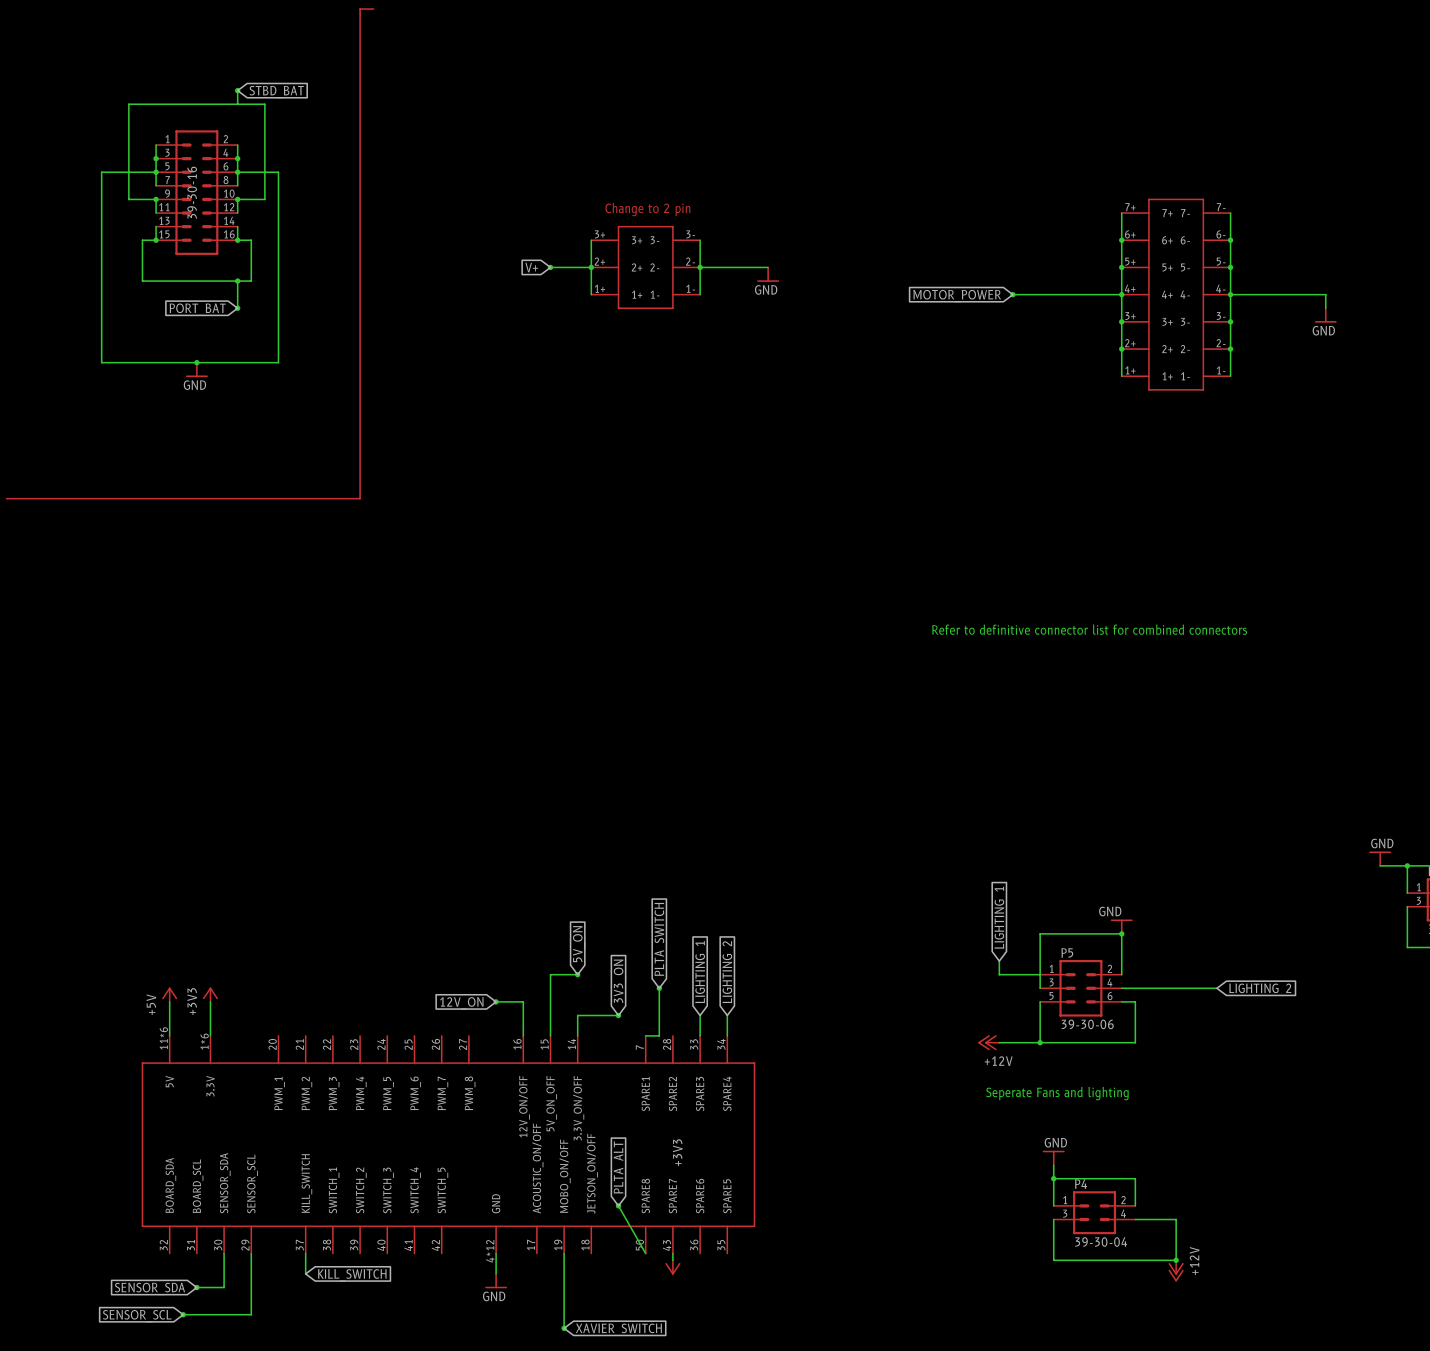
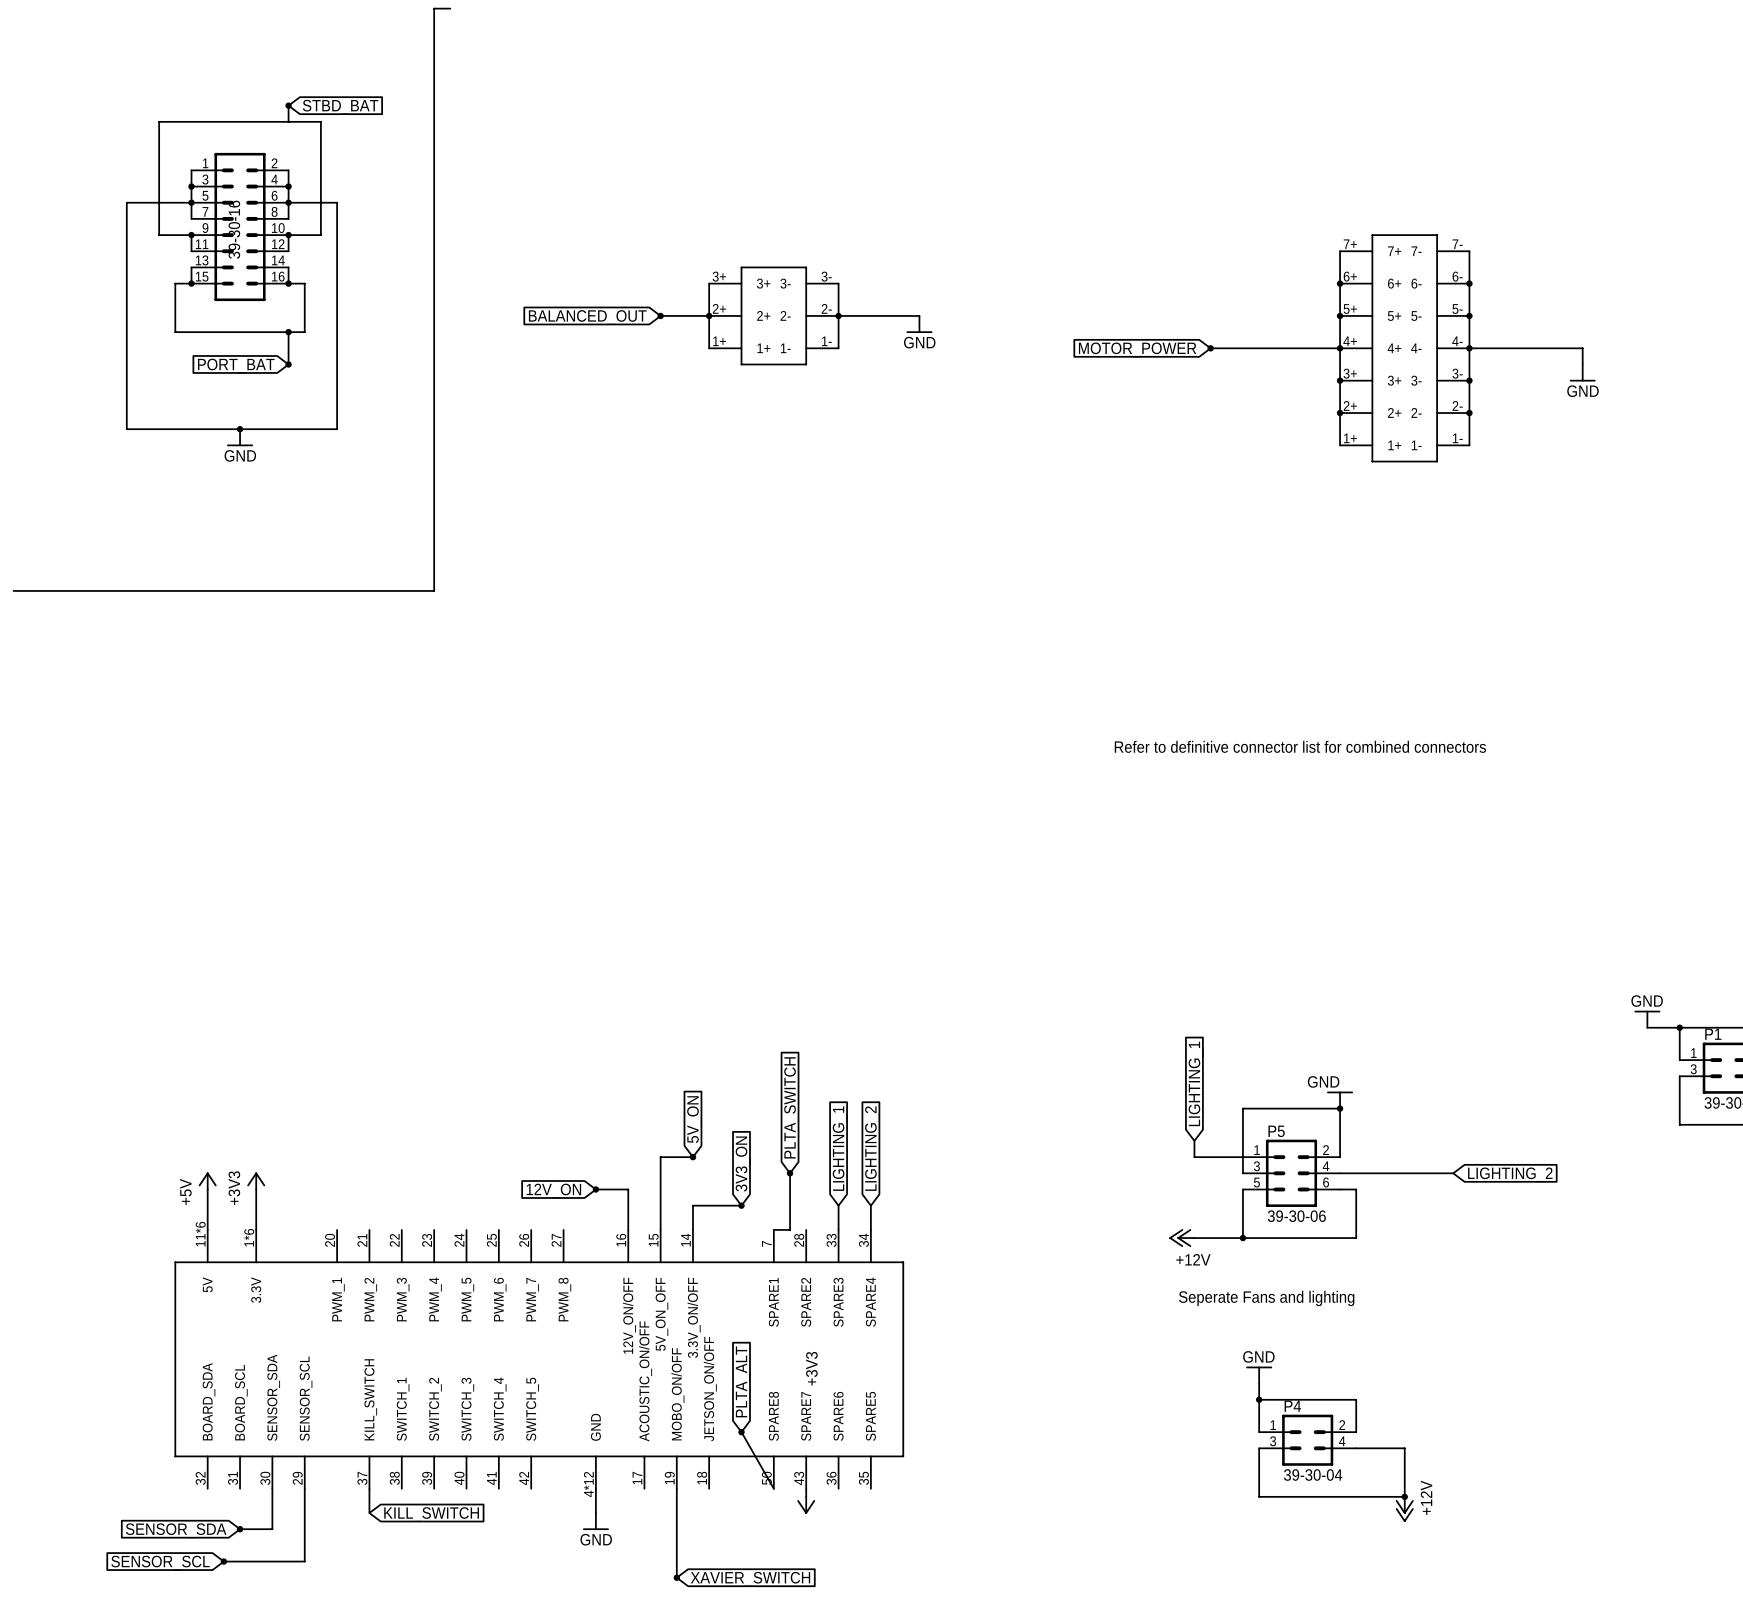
text: Change to 2 pin (647, 209) -> none
global label: V+ (531, 267) -> BALANCED_OUT (587, 317)

